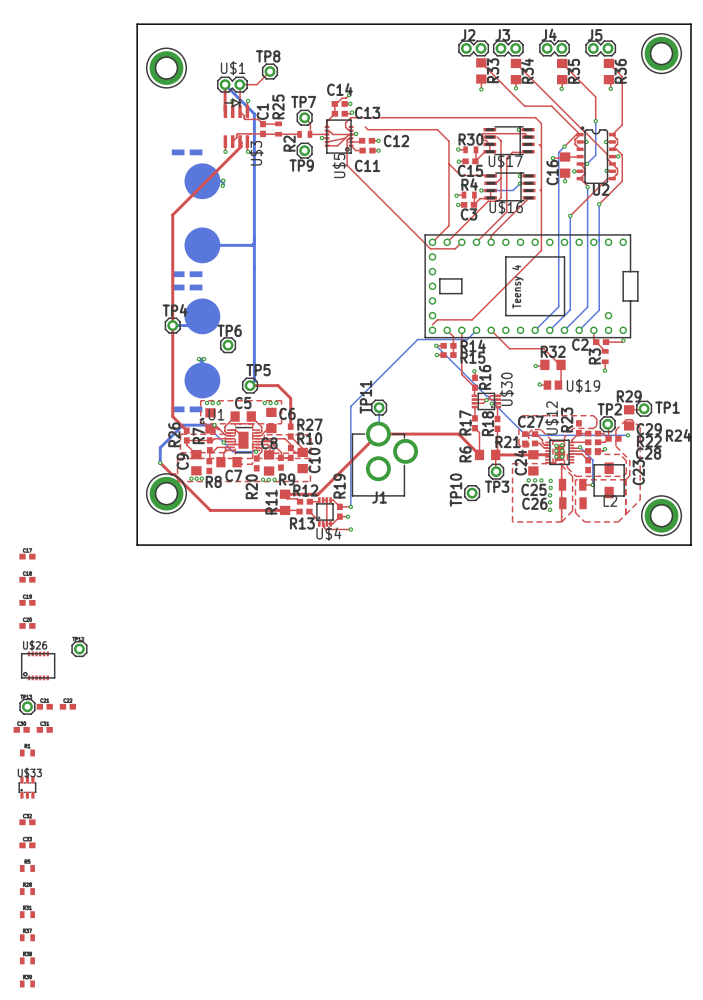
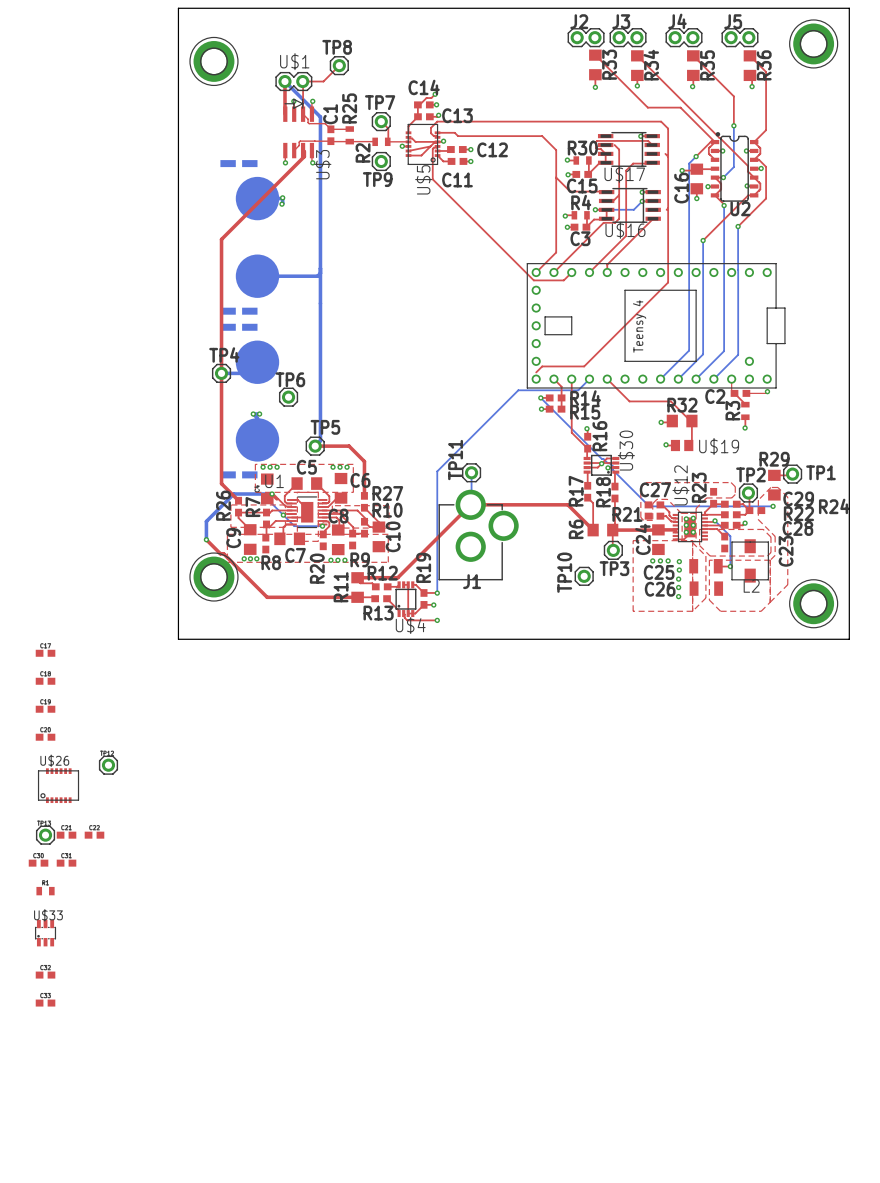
top track: none -> (437, 132) (454, 132)
part: (27, 868) -> none
part: (27, 891) -> none
part: (27, 914) -> none
part: (27, 937) -> none
part: (27, 960) -> none
part: (27, 983) -> none

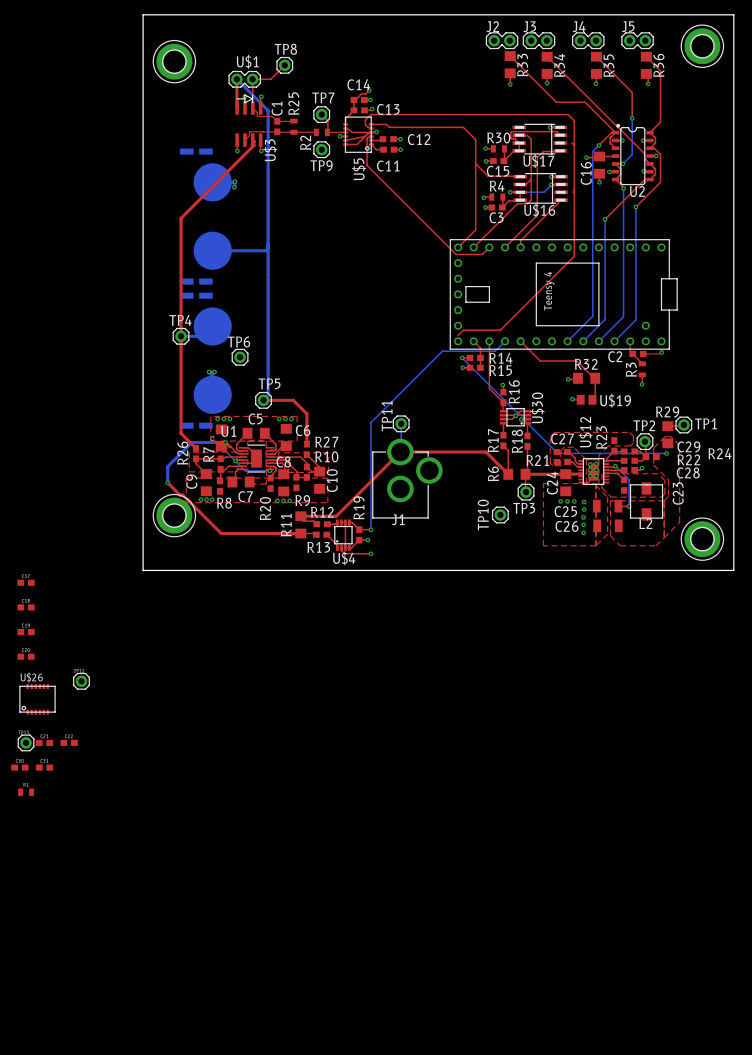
U$33: (45, 933) -> none
part: (45, 975) -> none
part: (45, 1003) -> none

